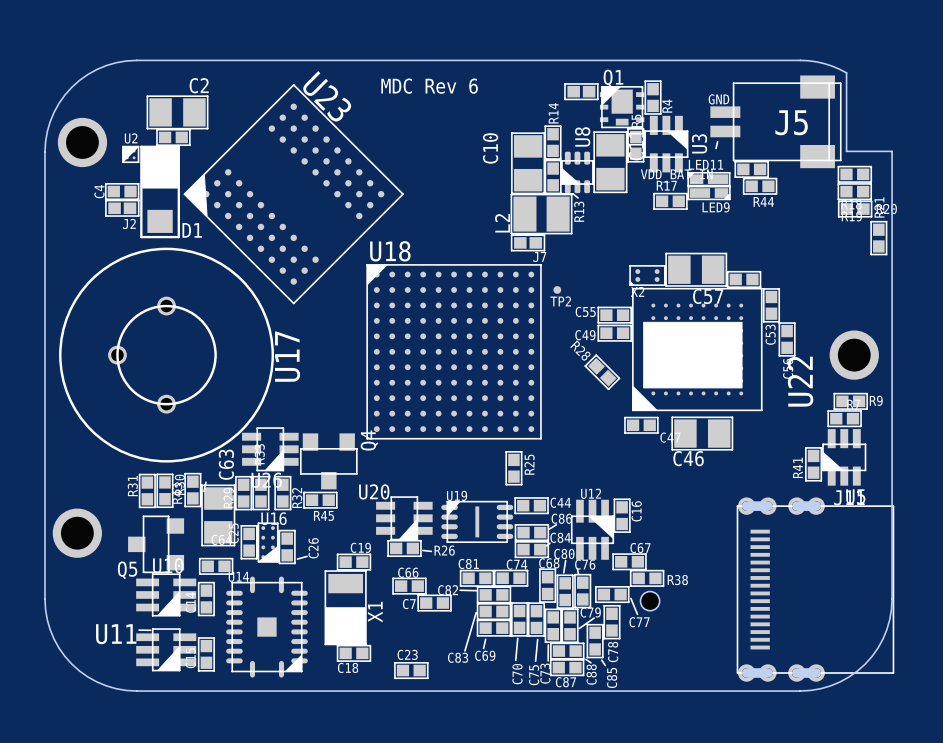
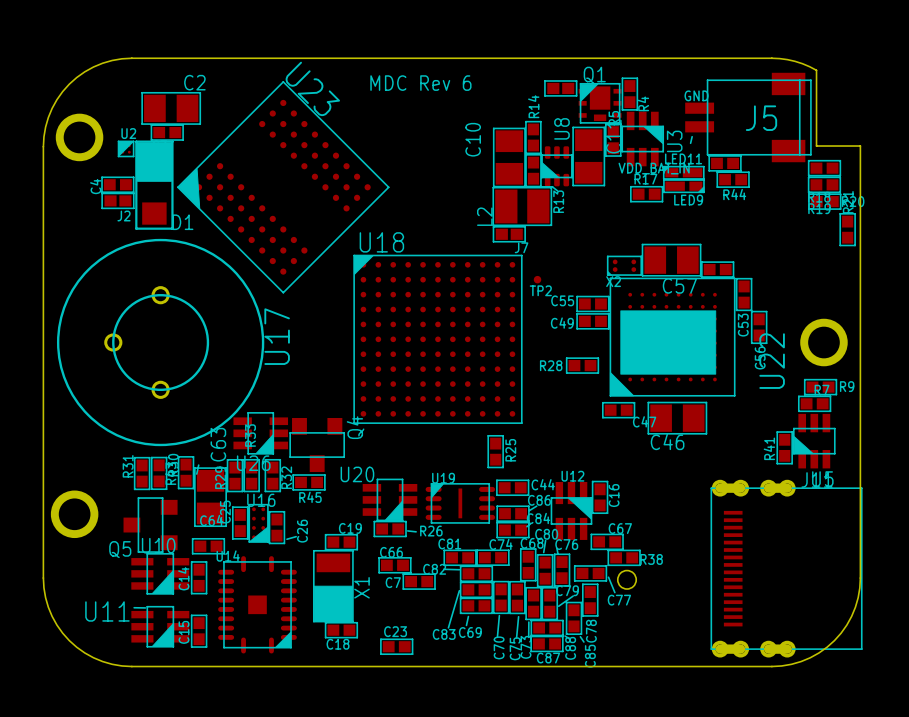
R28 rotation: 0° (602, 372) -> 45° counterclockwise (582, 365)

